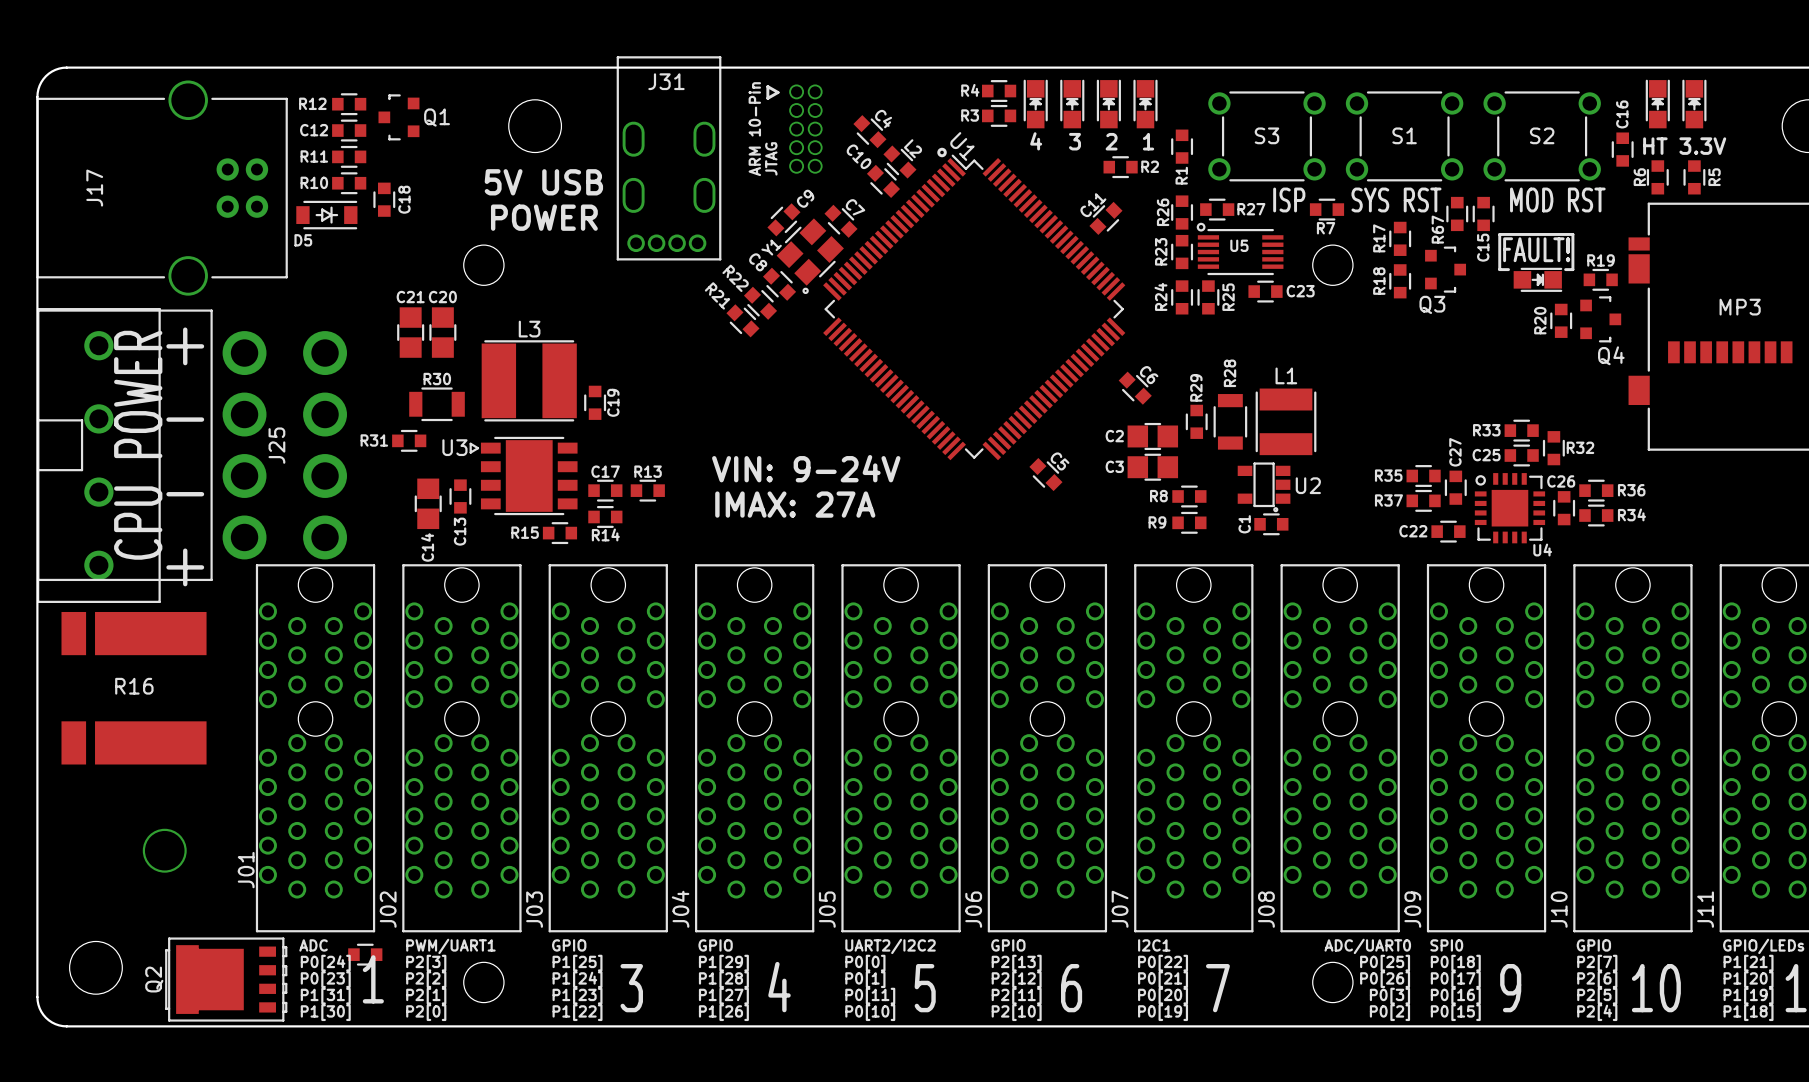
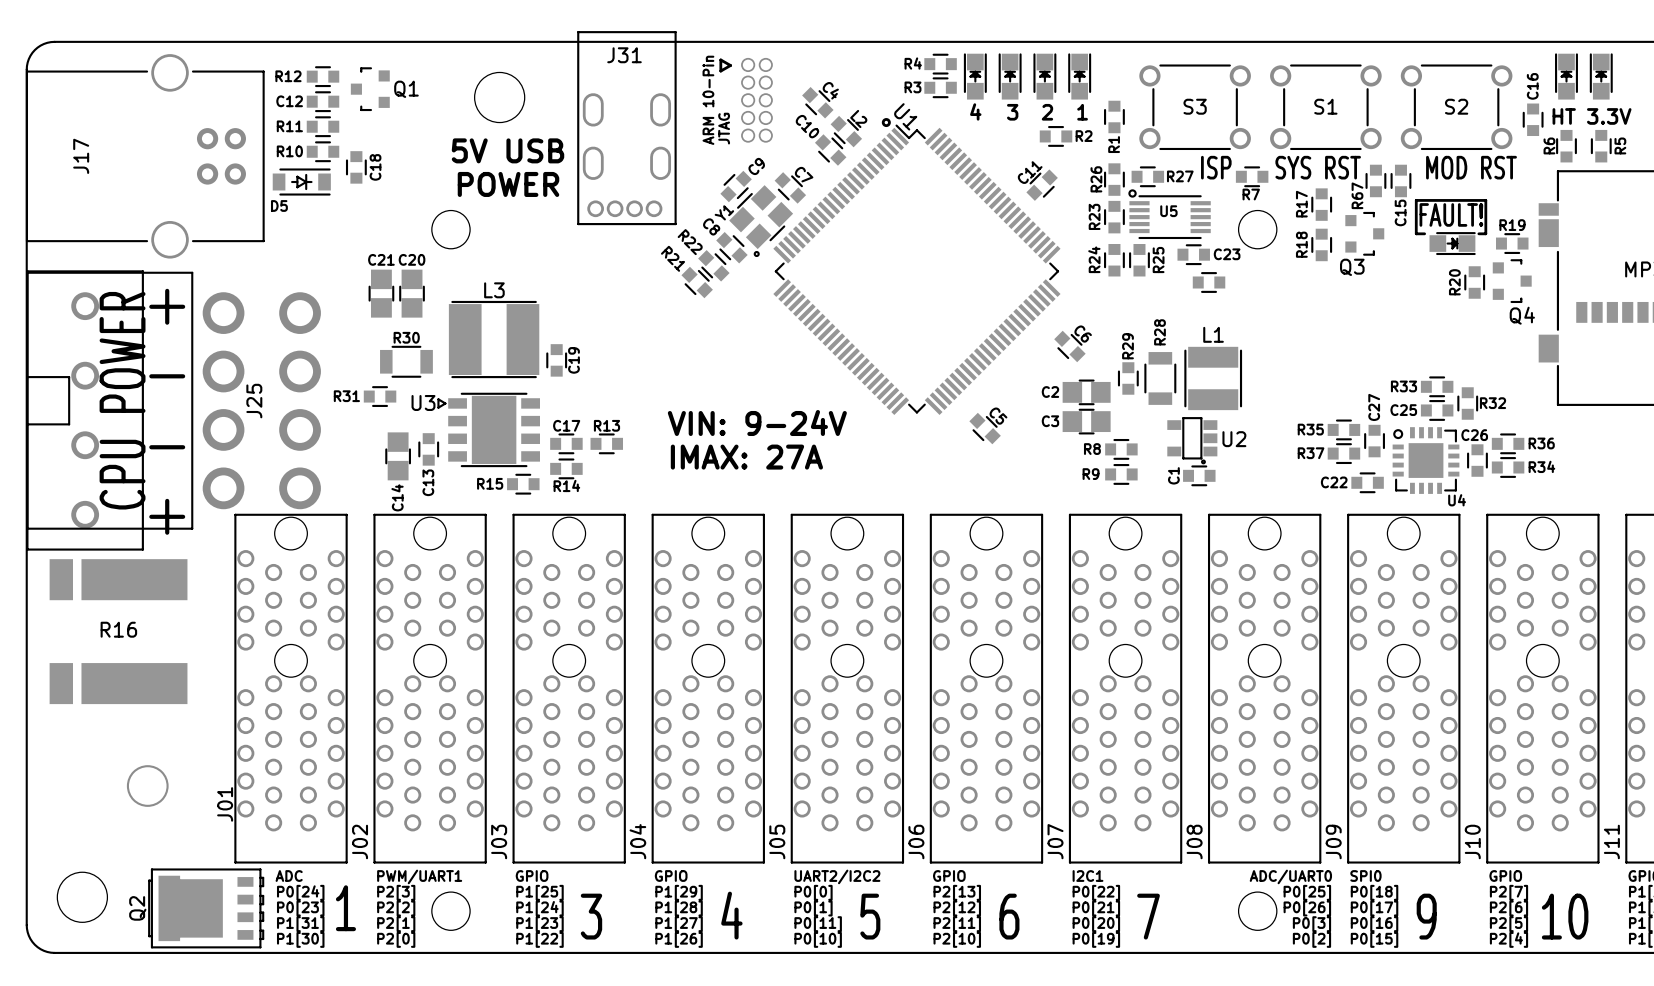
part: none -> (1209, 282)
part: (365, 954) -> none

